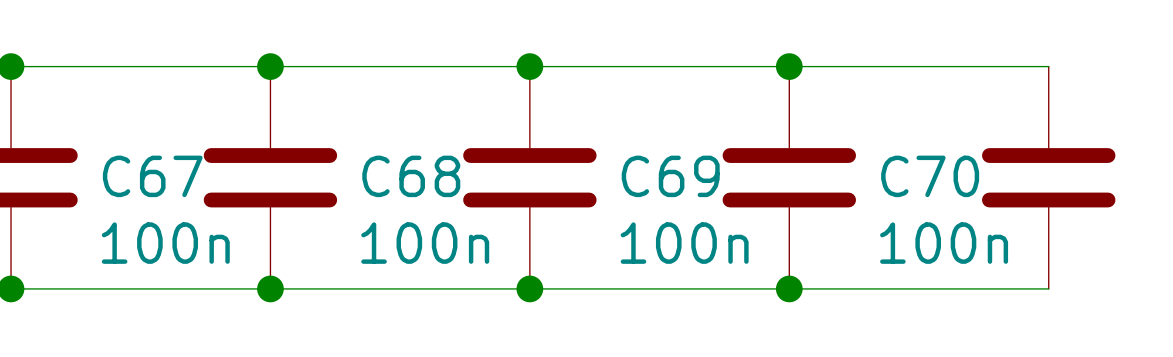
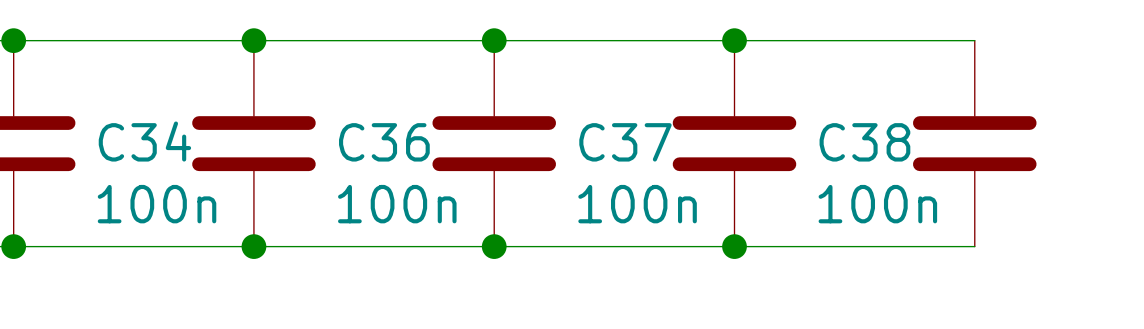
C67 name: C67 (152, 176) -> C34 (144, 141)
C68 name: C68 (411, 176) -> C36 (384, 142)
C69 name: C69 (670, 176) -> C37 (625, 142)
C70 name: C70 (930, 176) -> C38 (864, 142)

